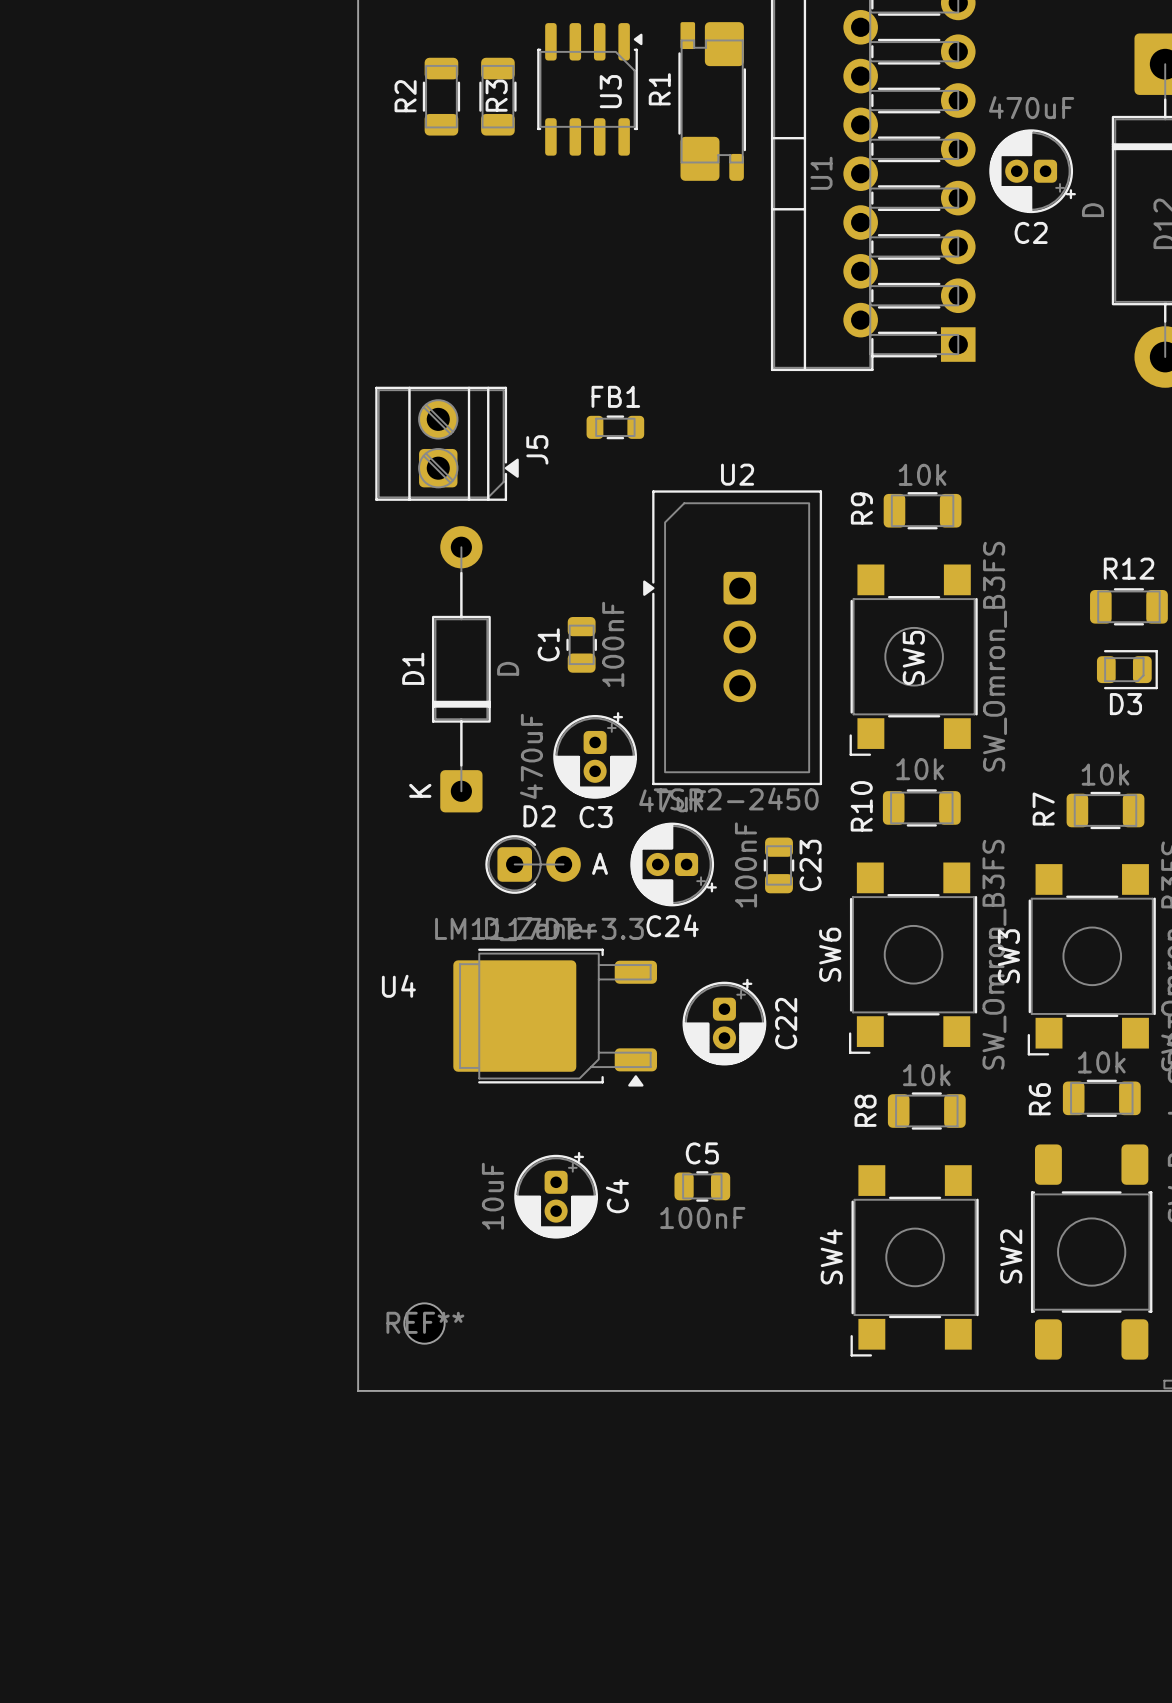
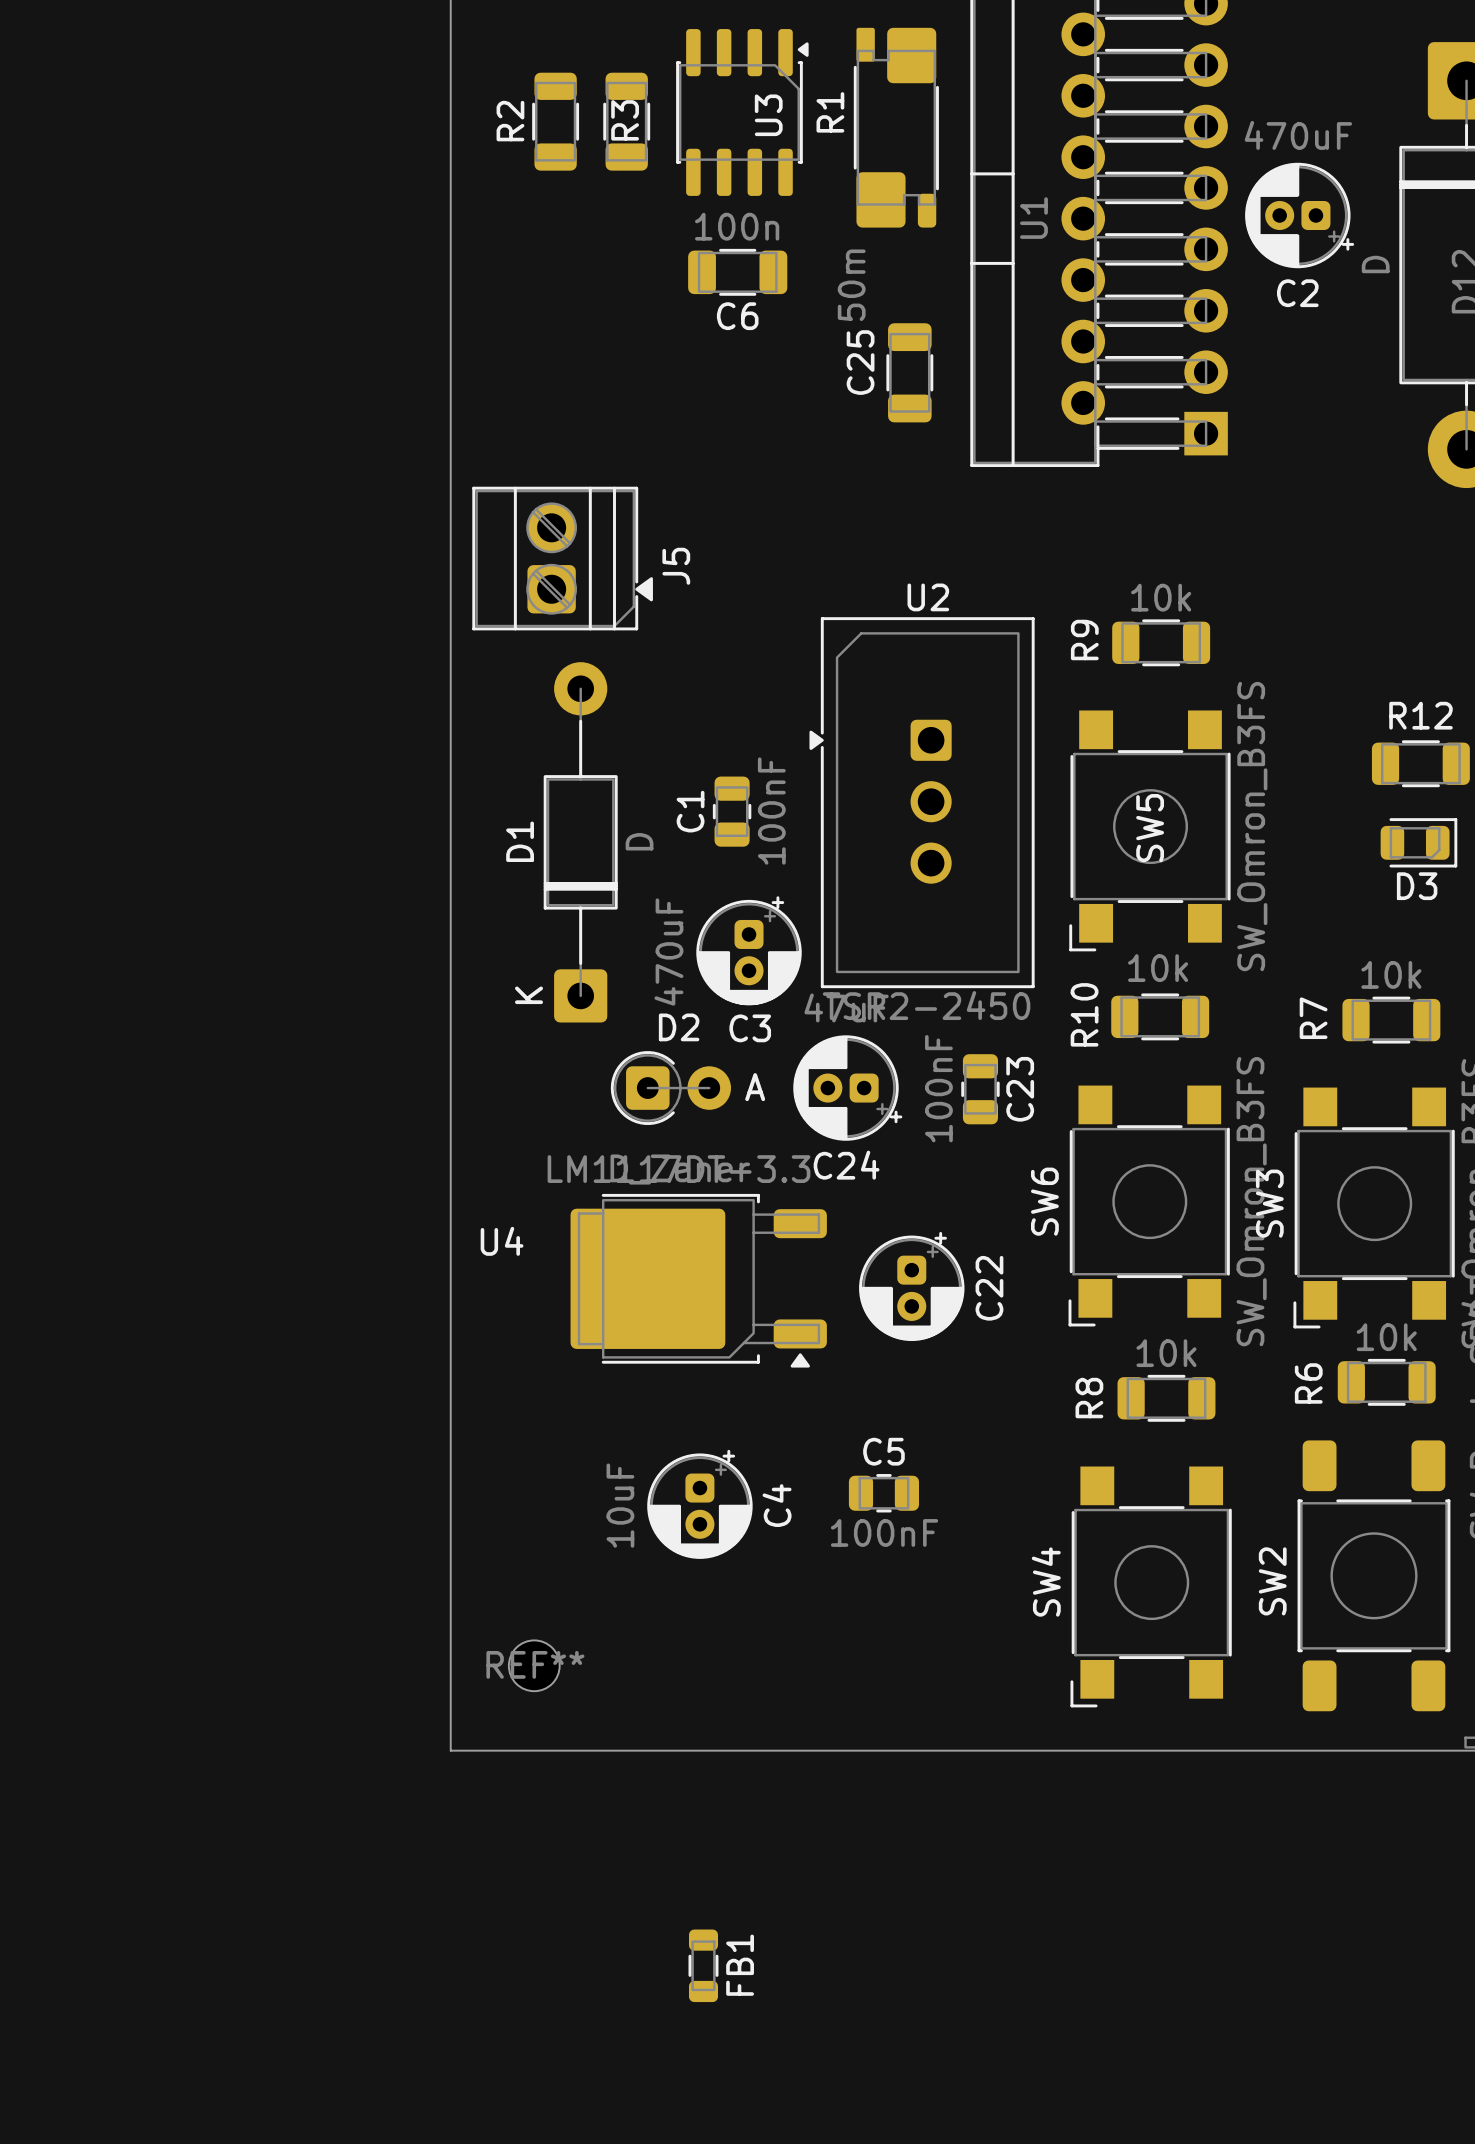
C6: none -> 100n (737, 272)
R1 value: none -> 50m (851, 285)
C25: none -> (909, 372)
FB1 rotation: 0° (615, 427) -> 90° clockwise (703, 1965)
FB1 position: (615, 427) -> (703, 1965)

